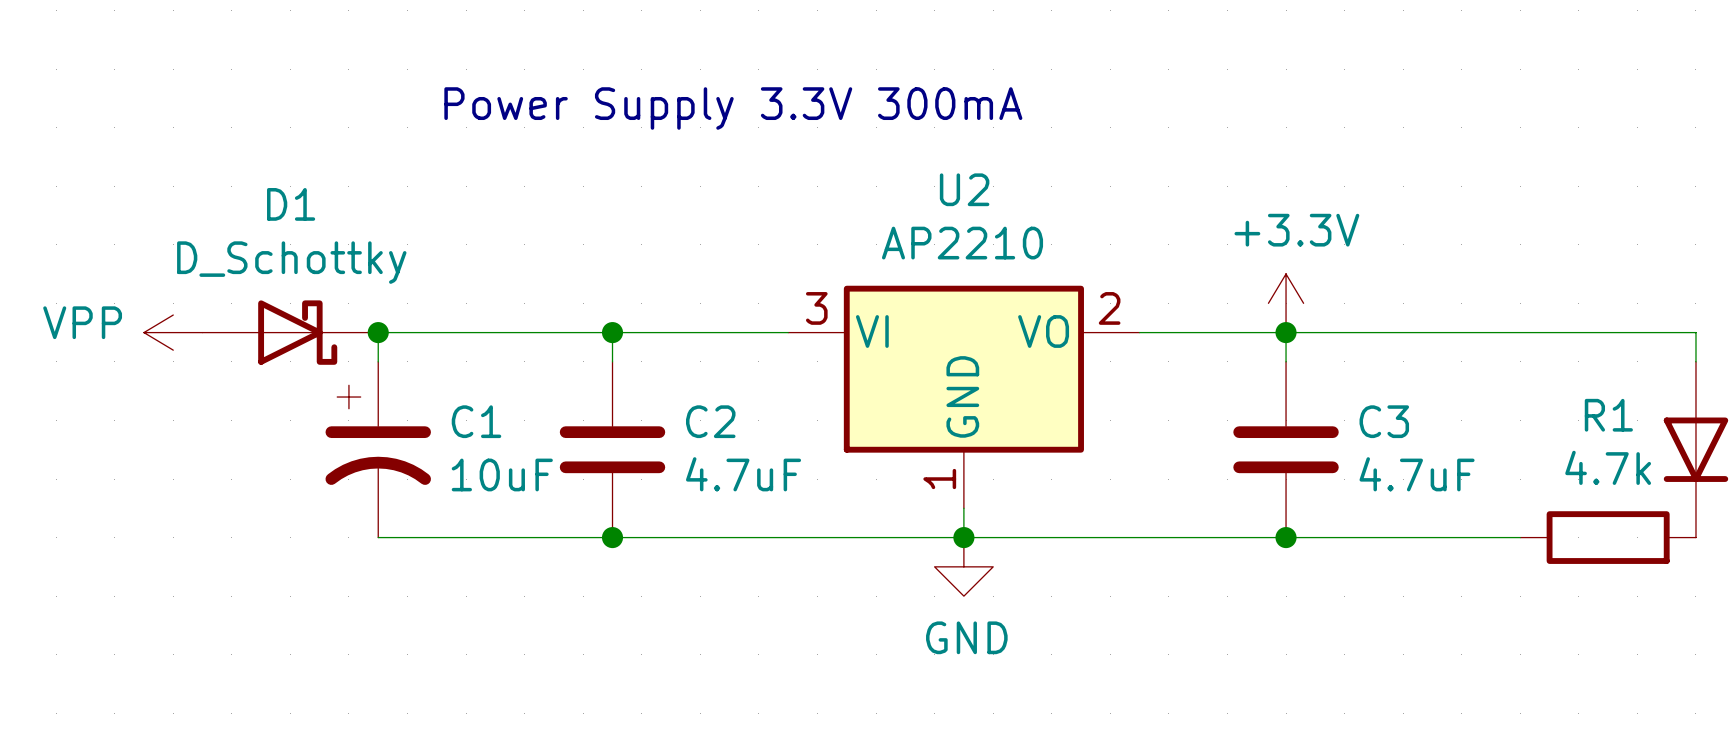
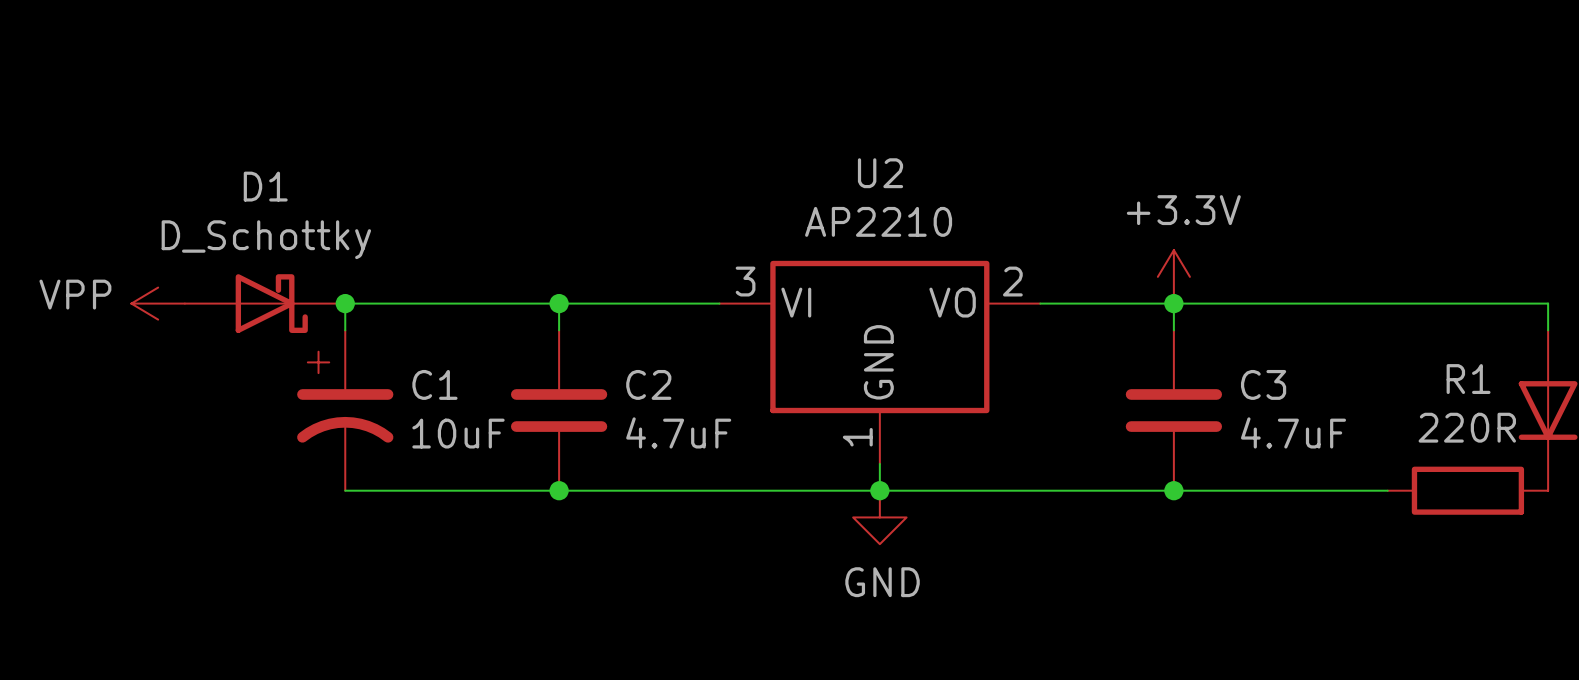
text: Power Supply 3.3V 300mA (733, 108) -> none
R1 value: 4.7k (1608, 467) -> 220R (1467, 427)

